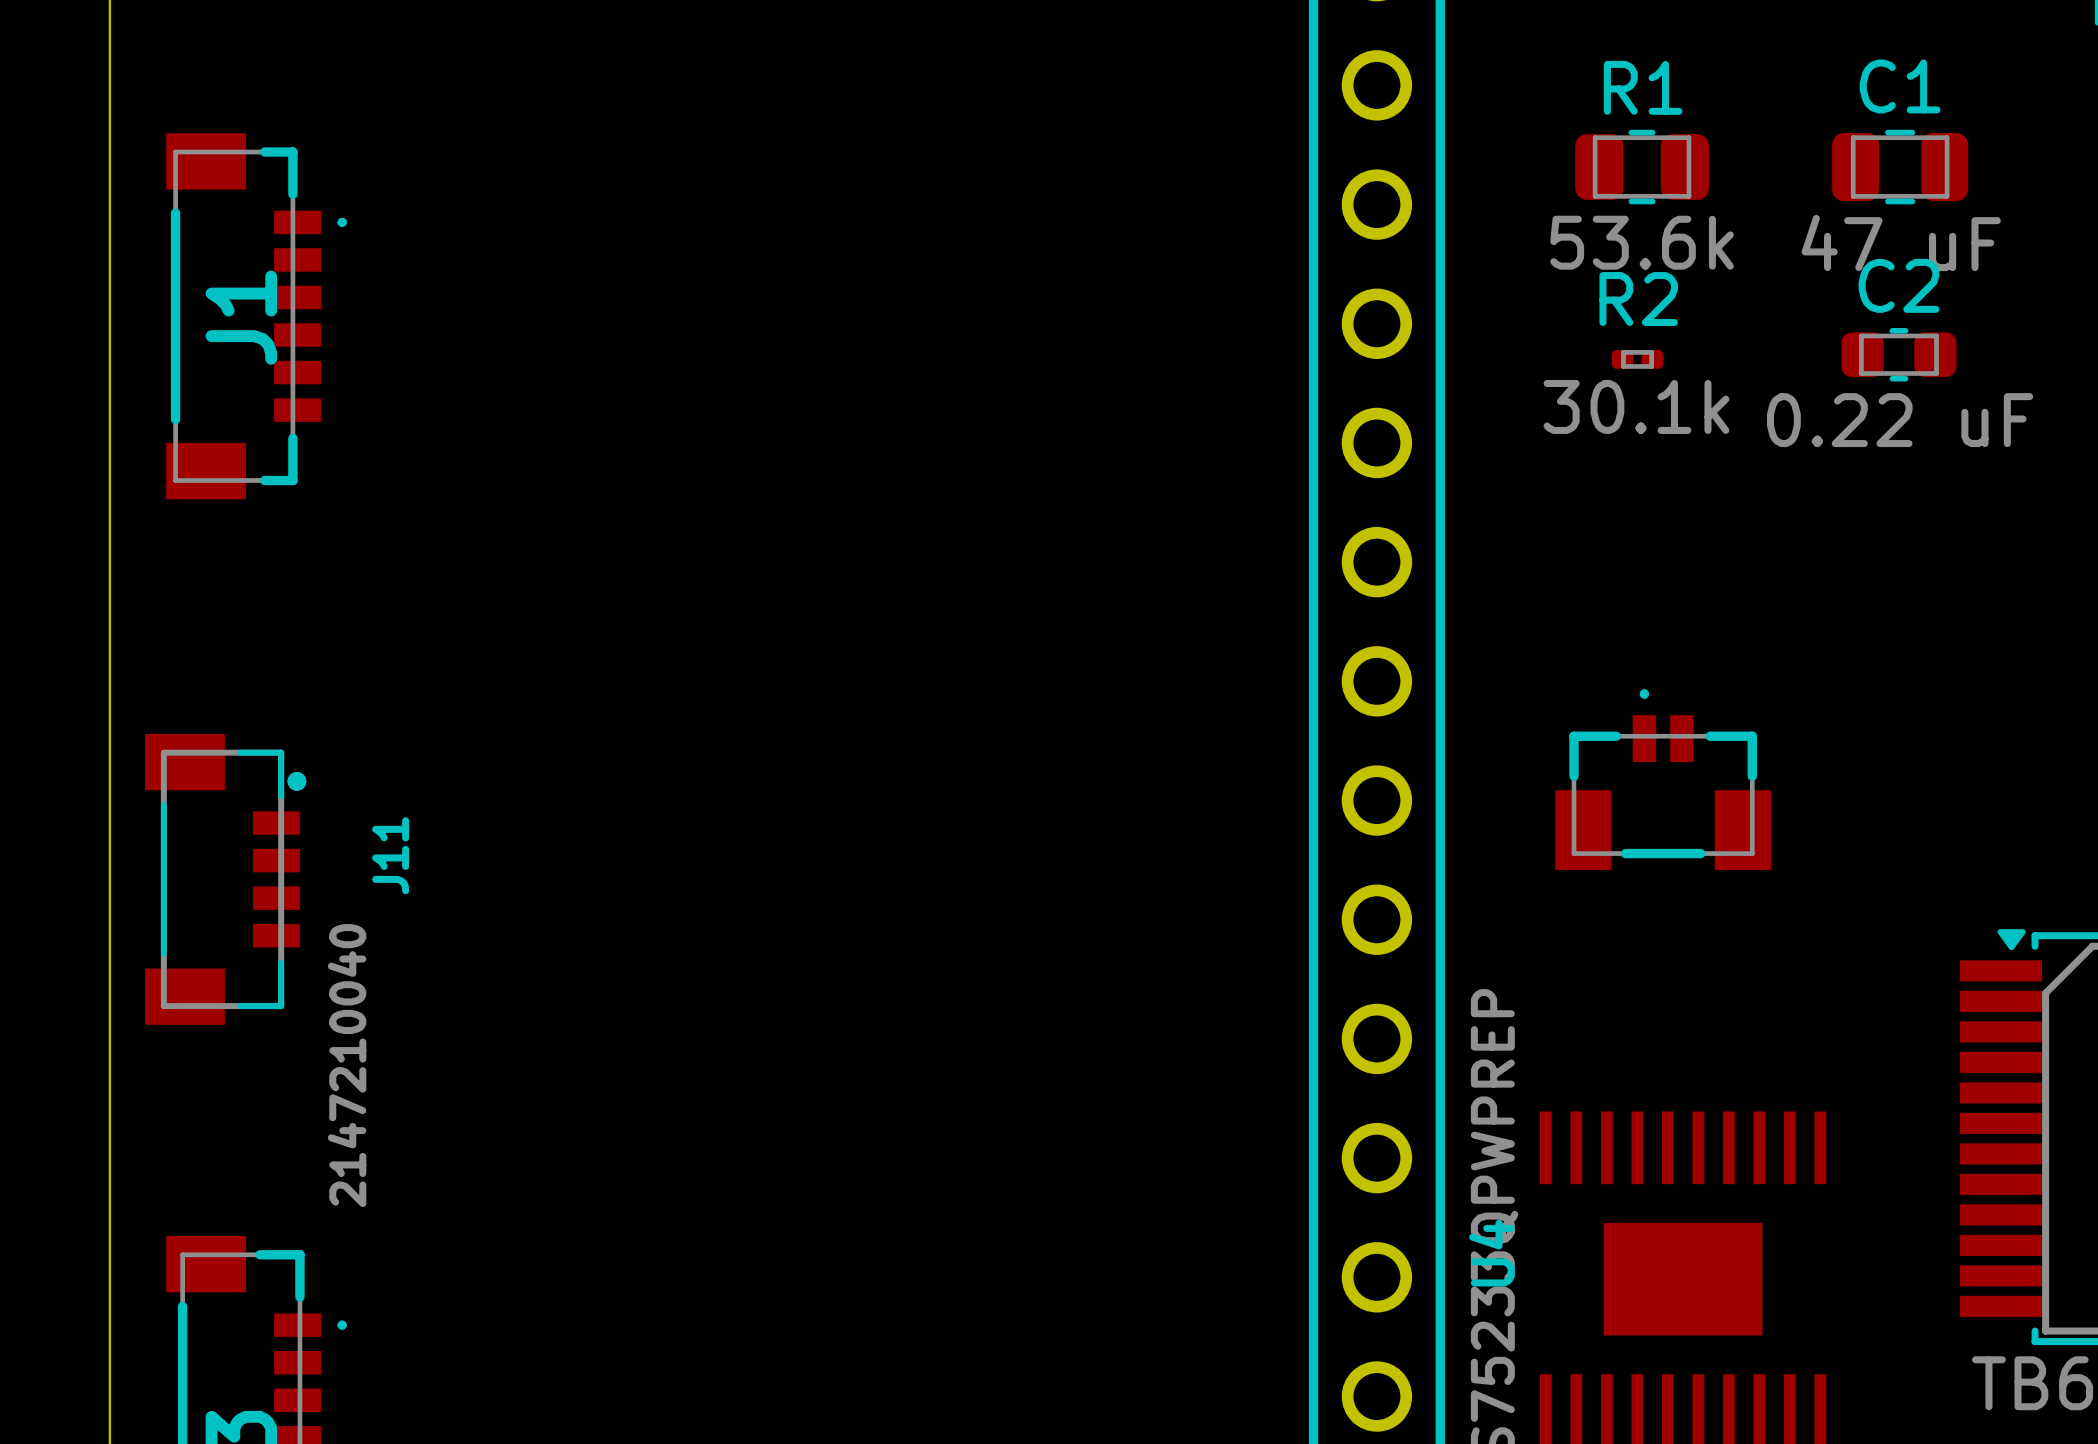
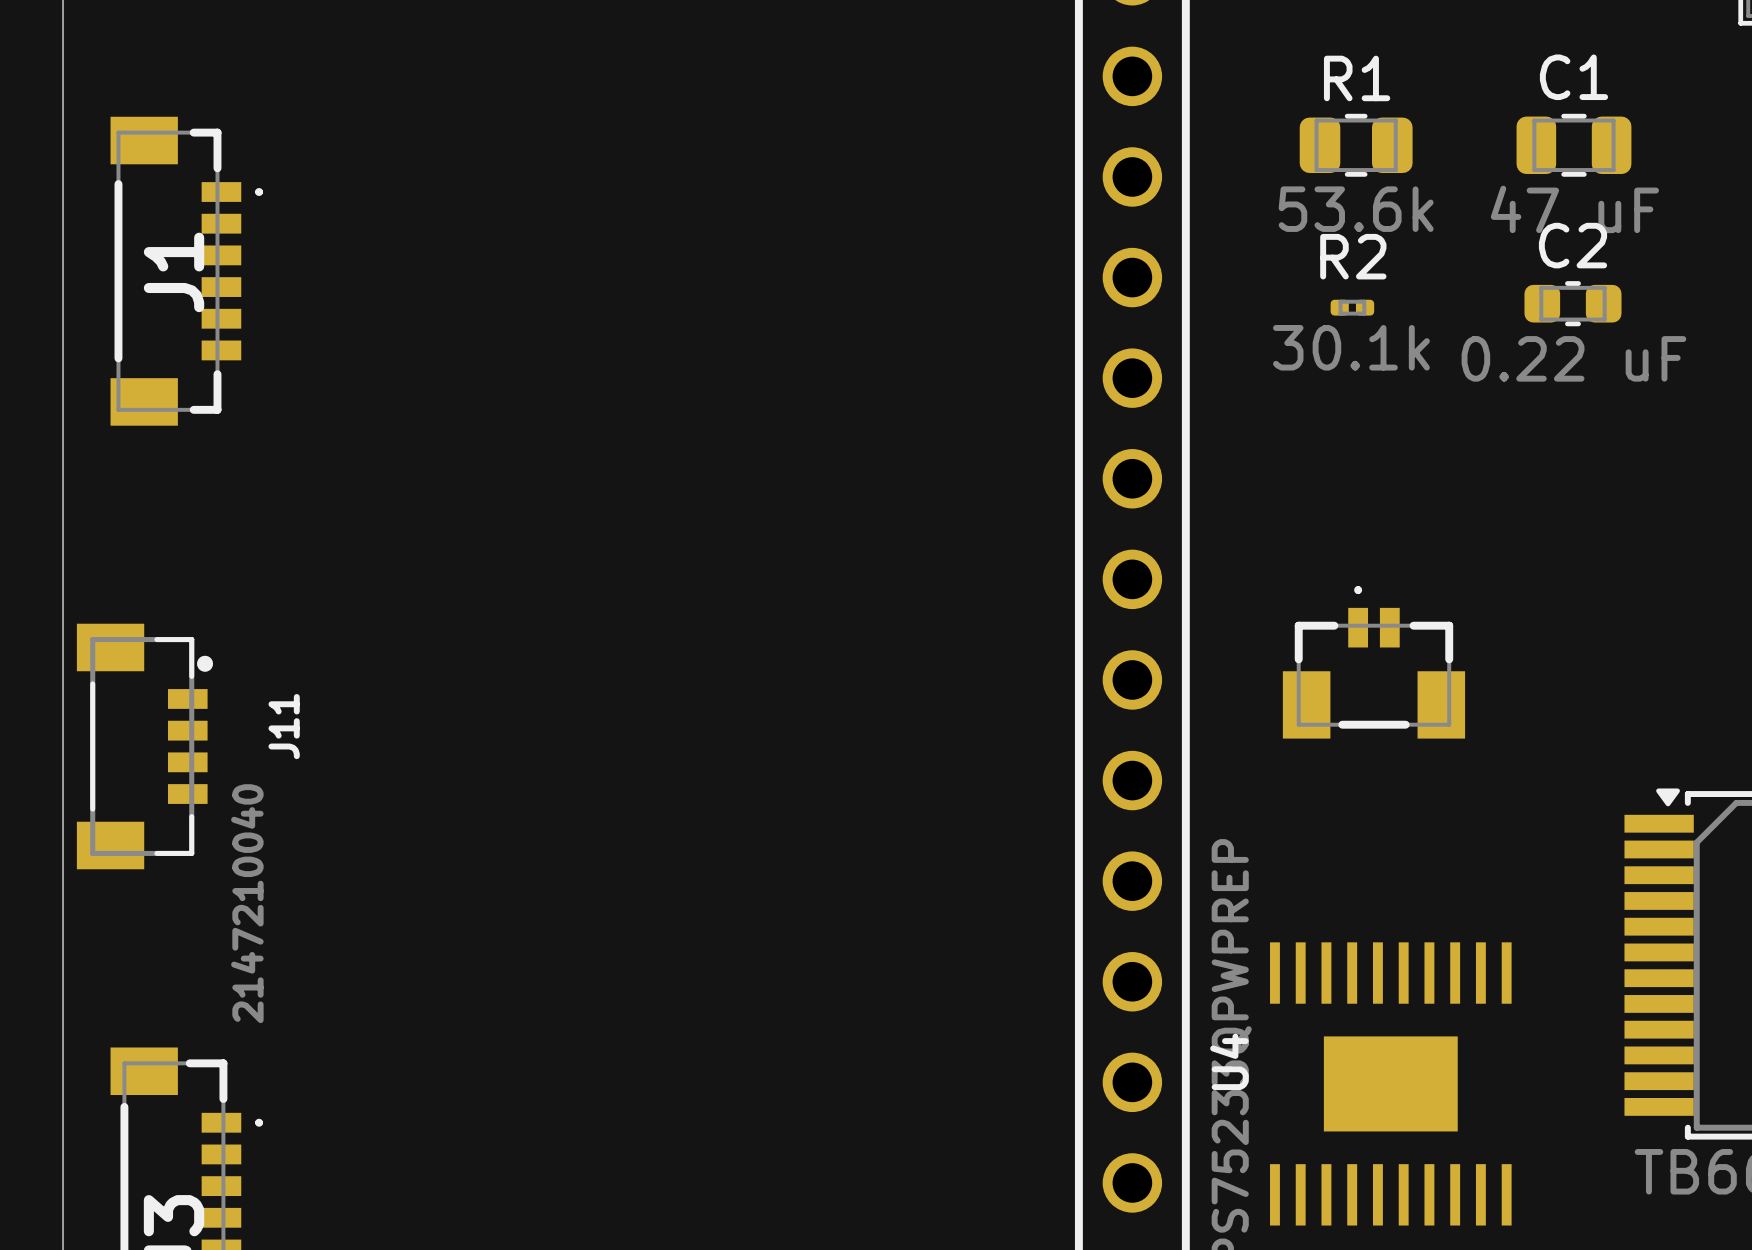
J11 position: (225, 879) -> (144, 746)

